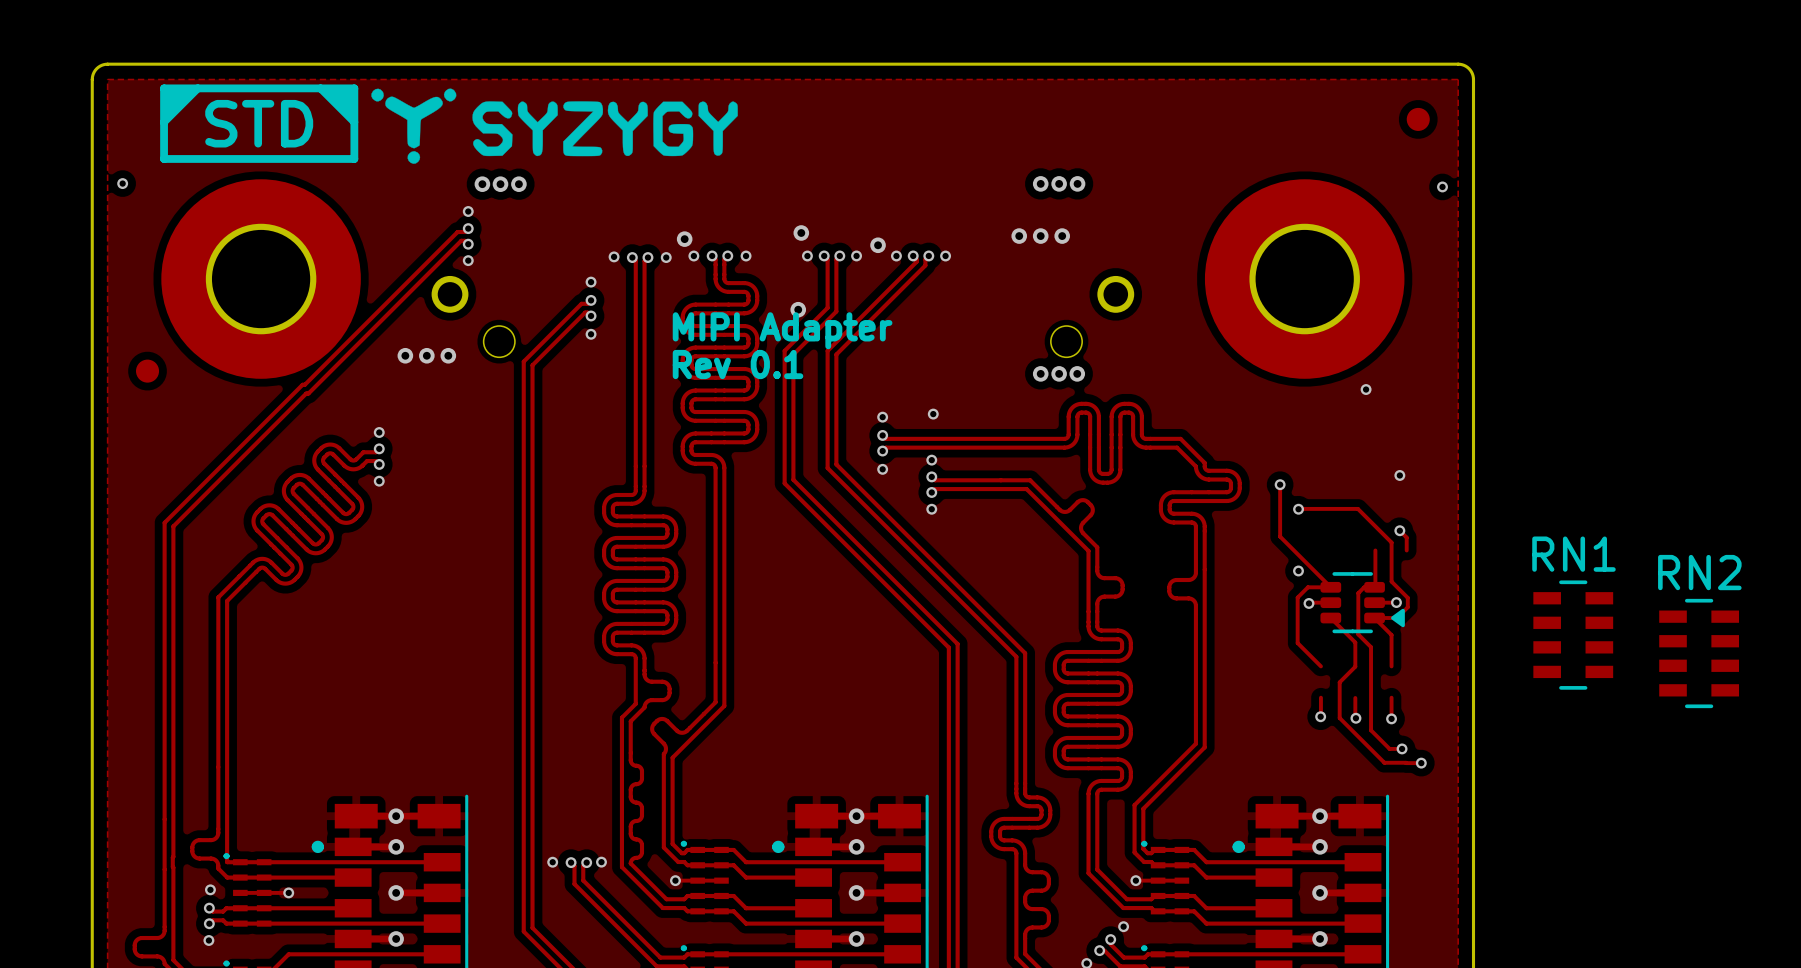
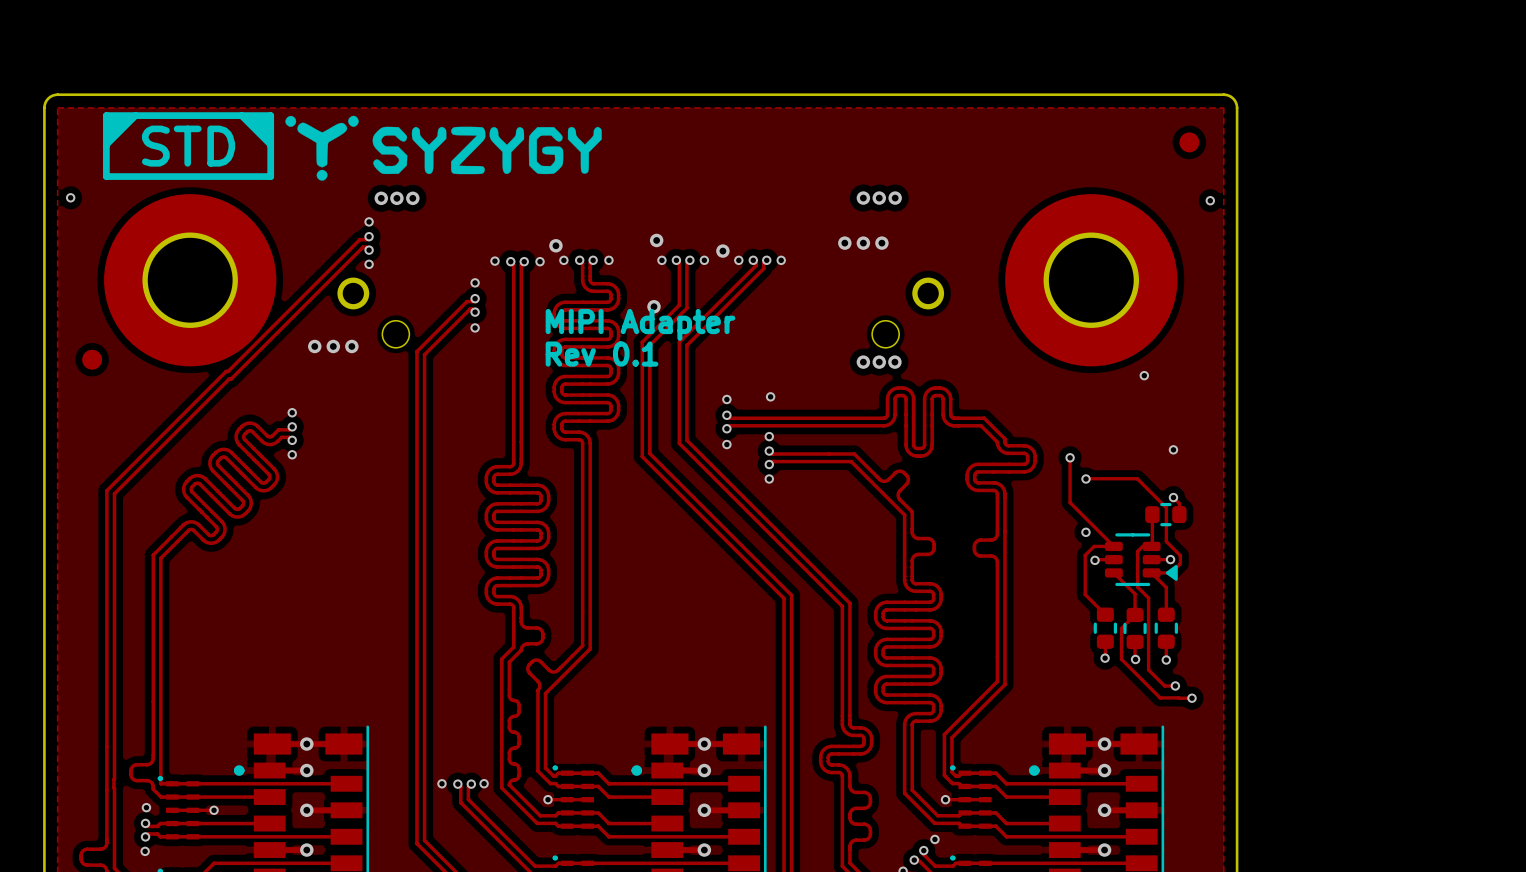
part: none -> (1165, 514)
RN1: (1573, 635) -> none
RN2: (1699, 653) -> none
part: none -> (1105, 628)
part: none -> (1135, 628)
part: none -> (1166, 628)

